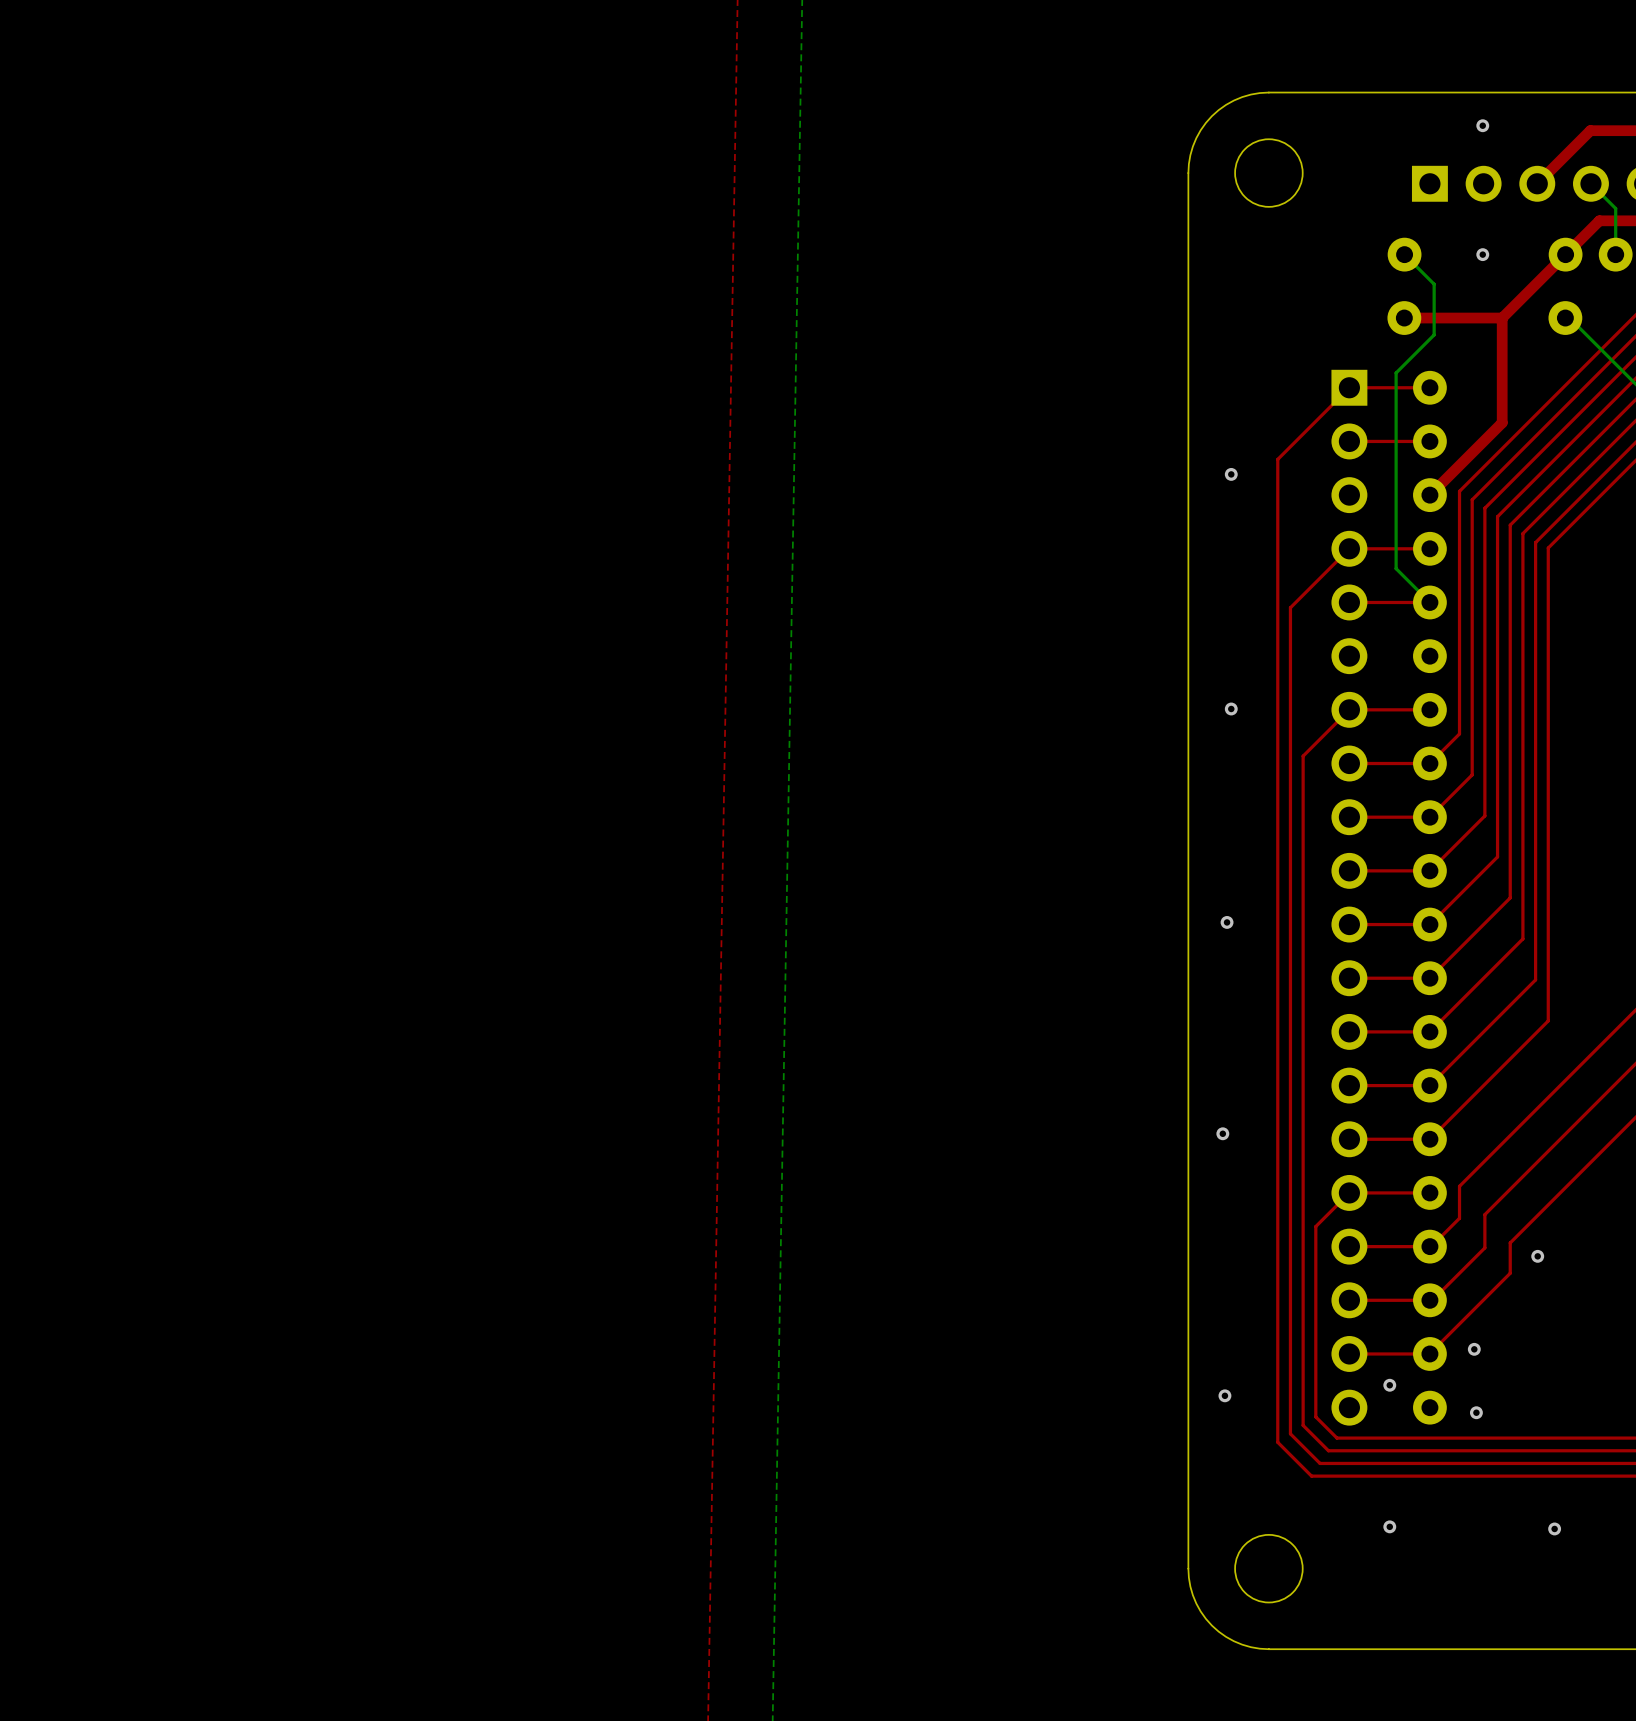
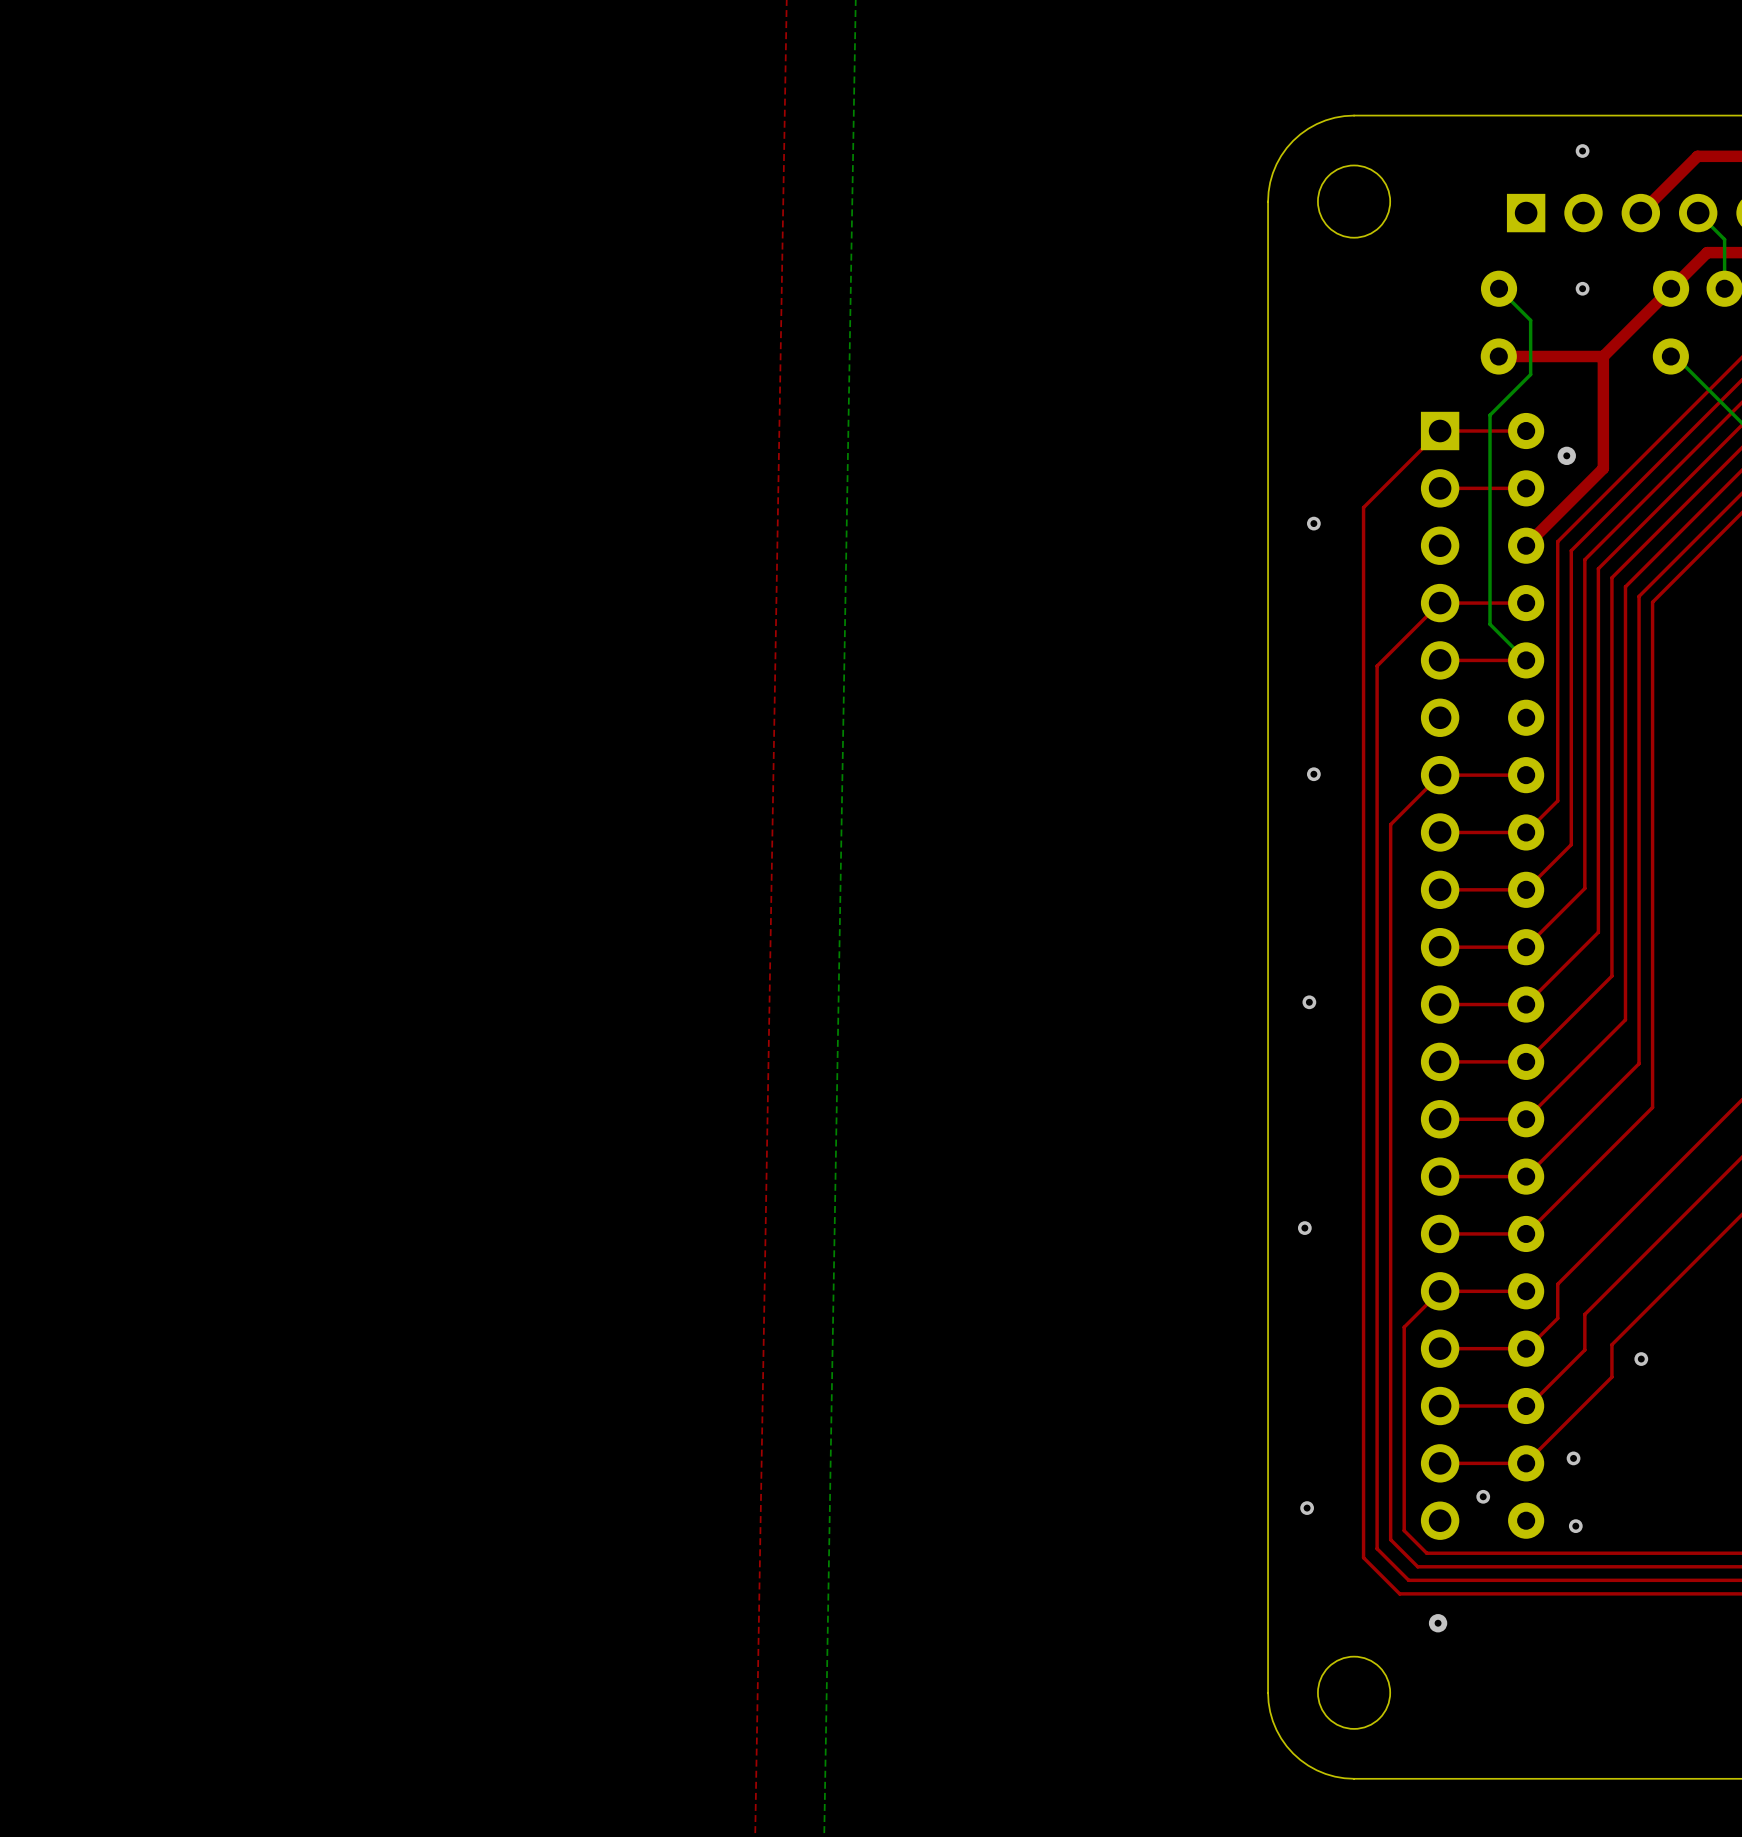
via: none -> (1566, 455)
via: none -> (1438, 1623)
via: (1389, 1526) -> none
via: (1554, 1528) -> none

